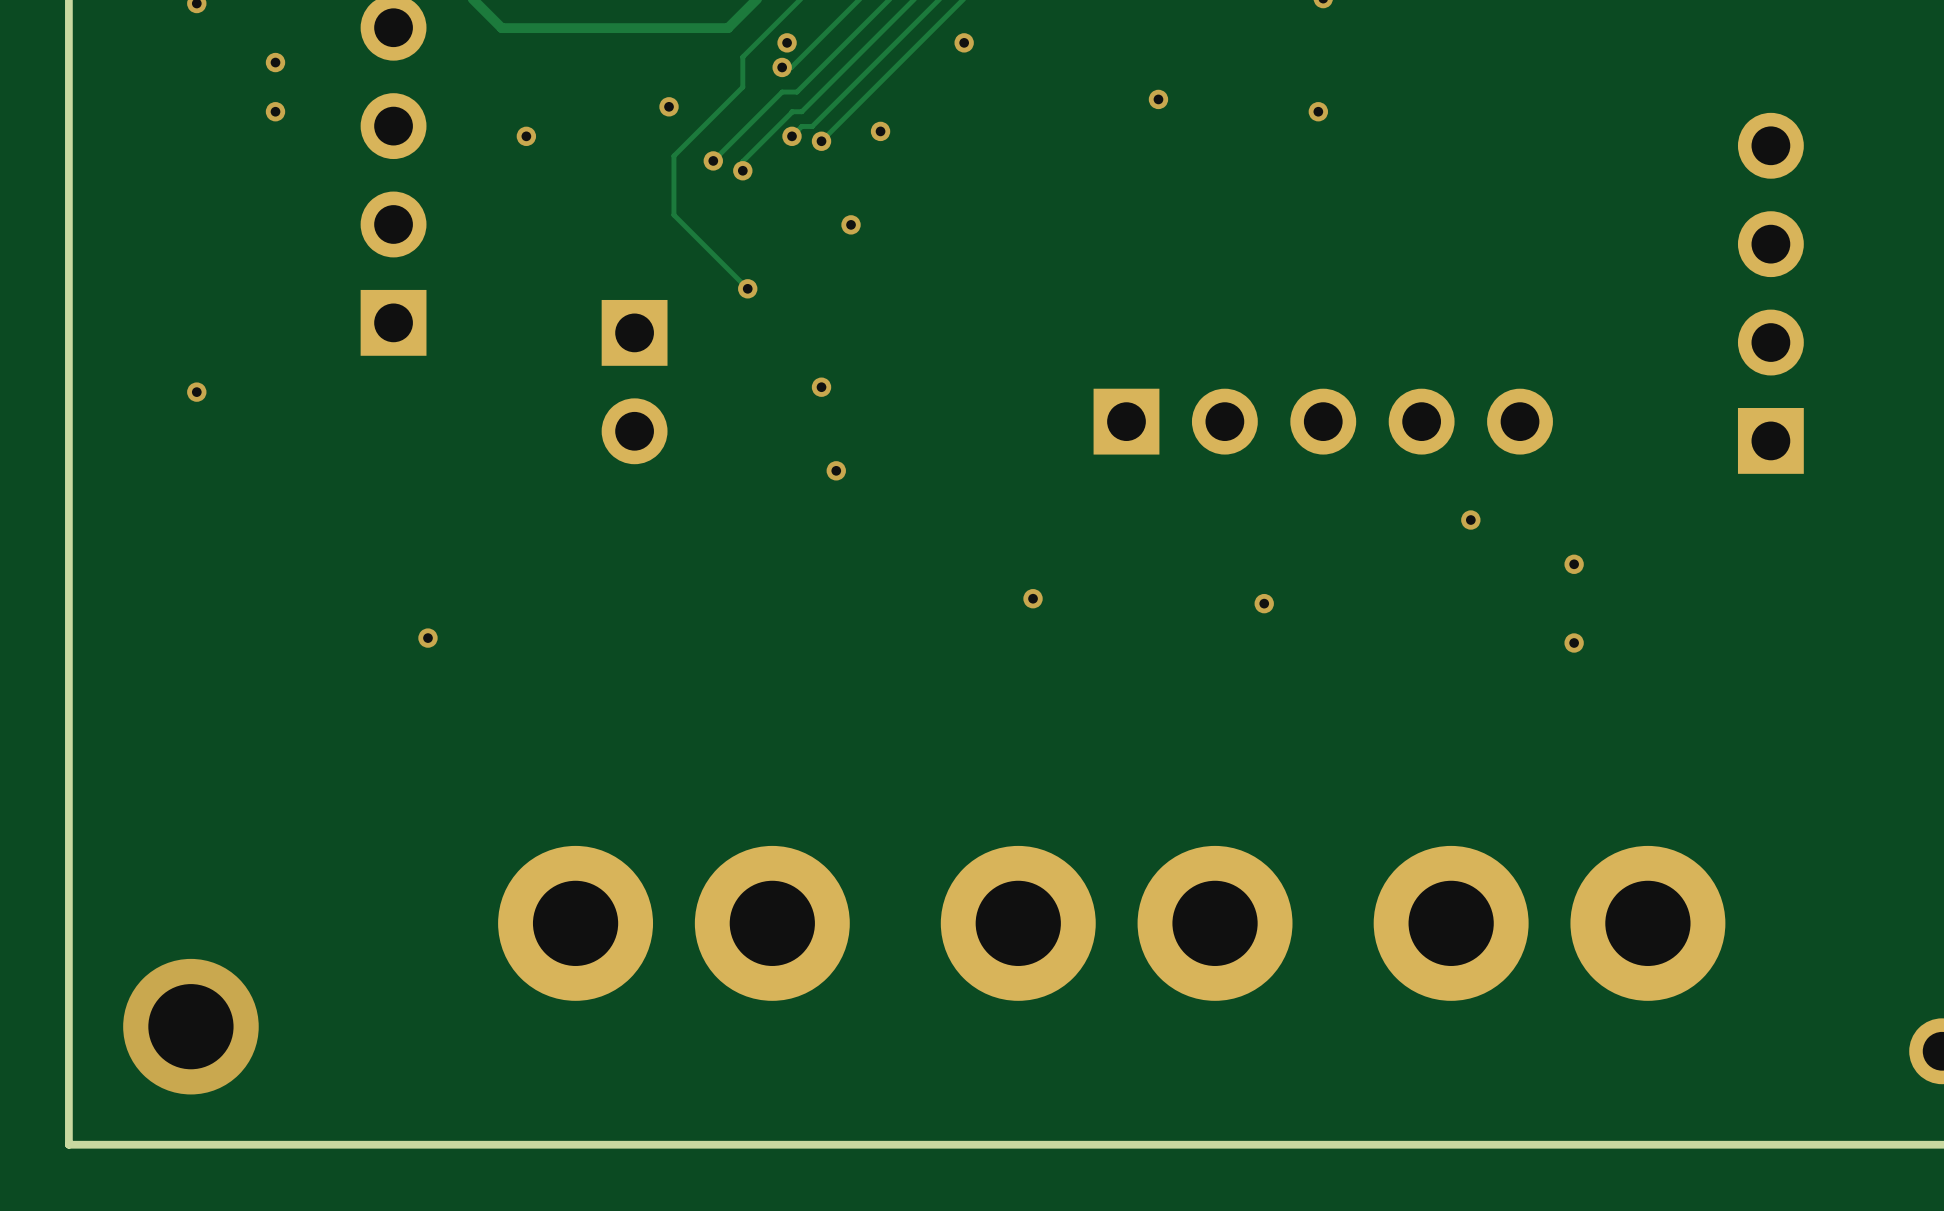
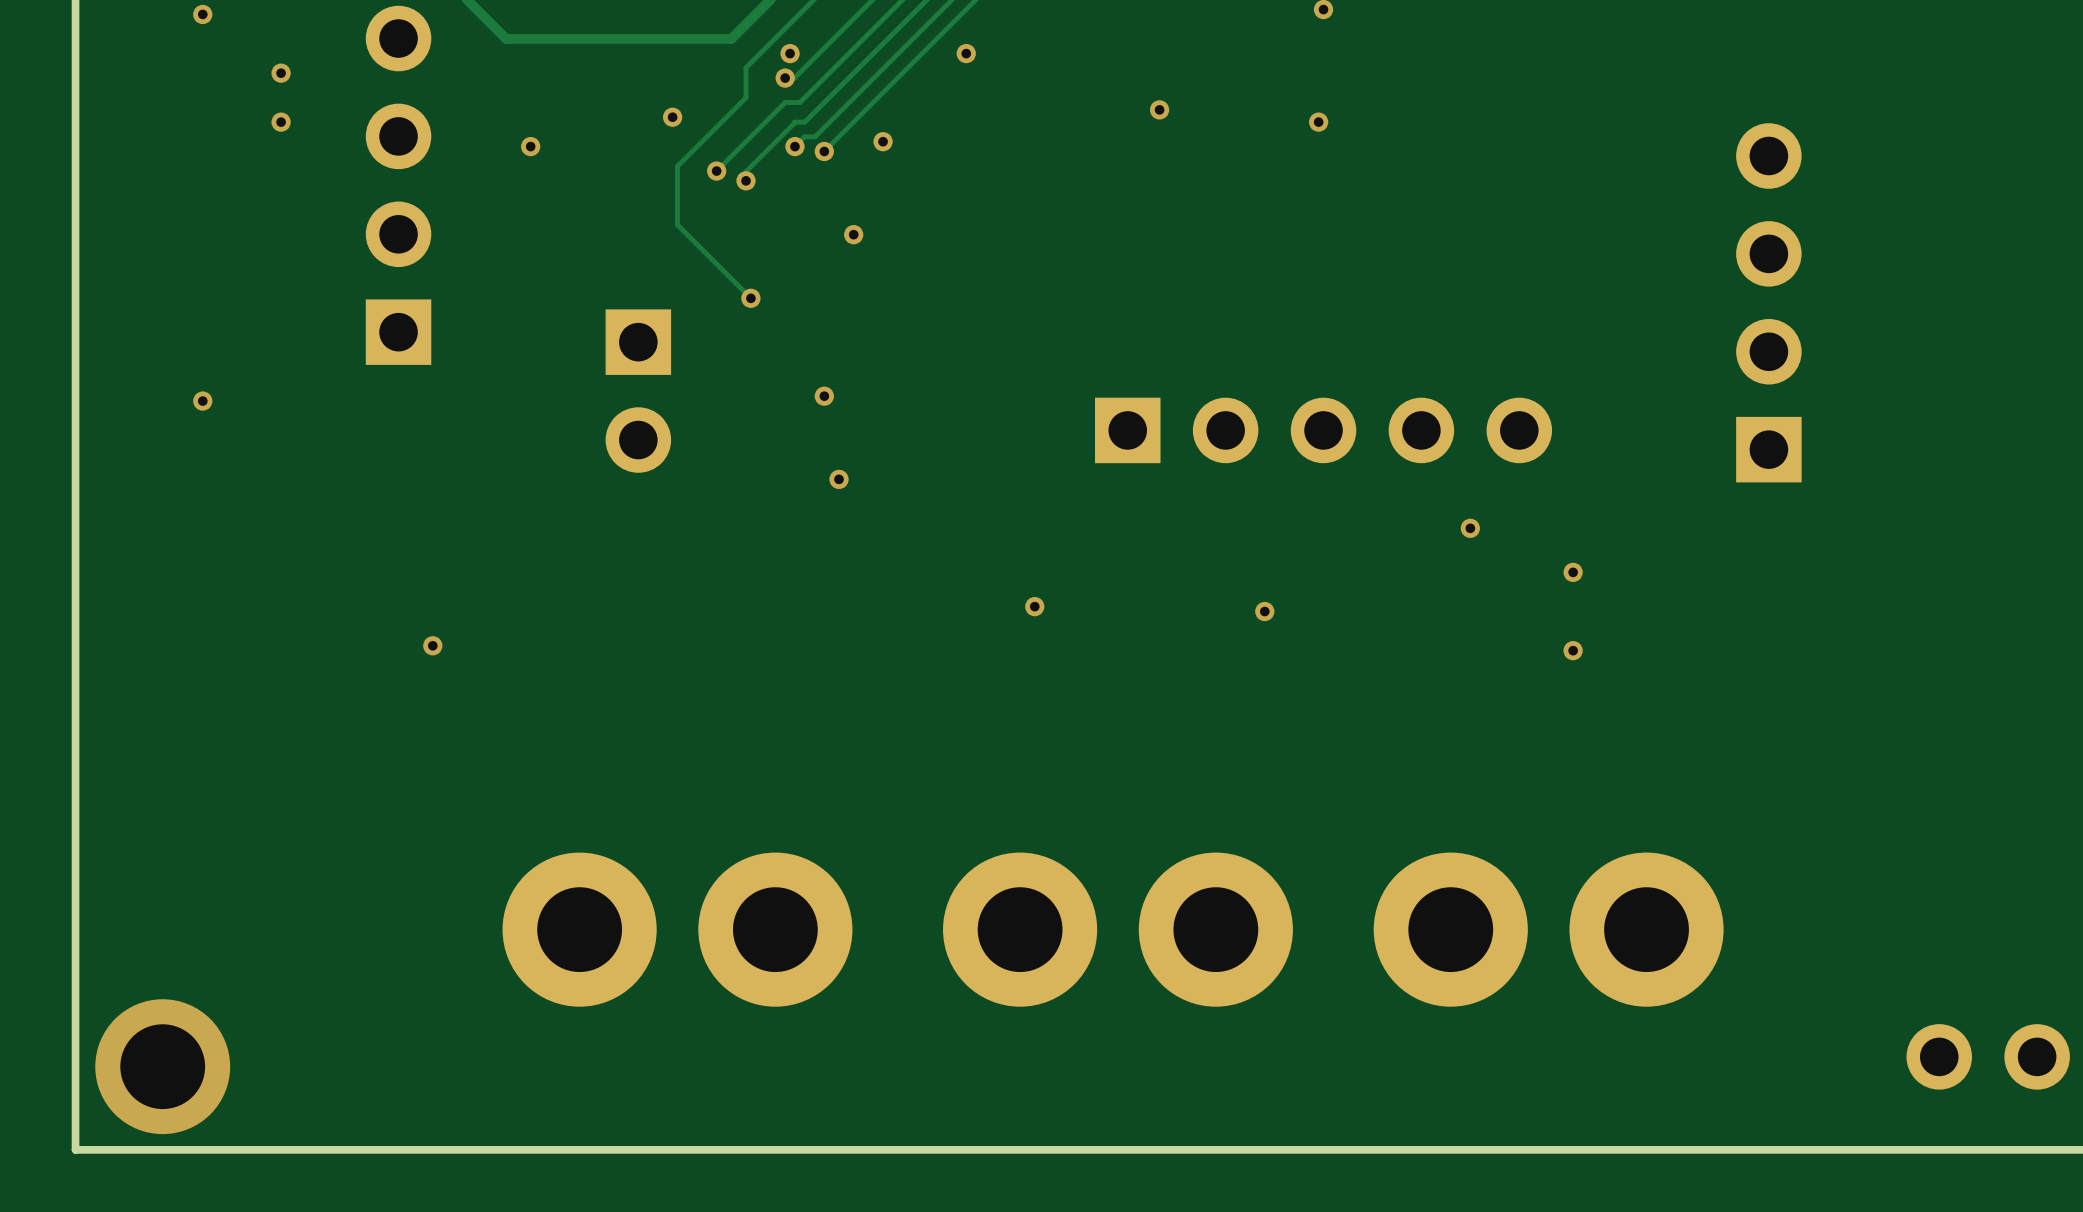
via position: (190, 1026) -> (162, 1066)

